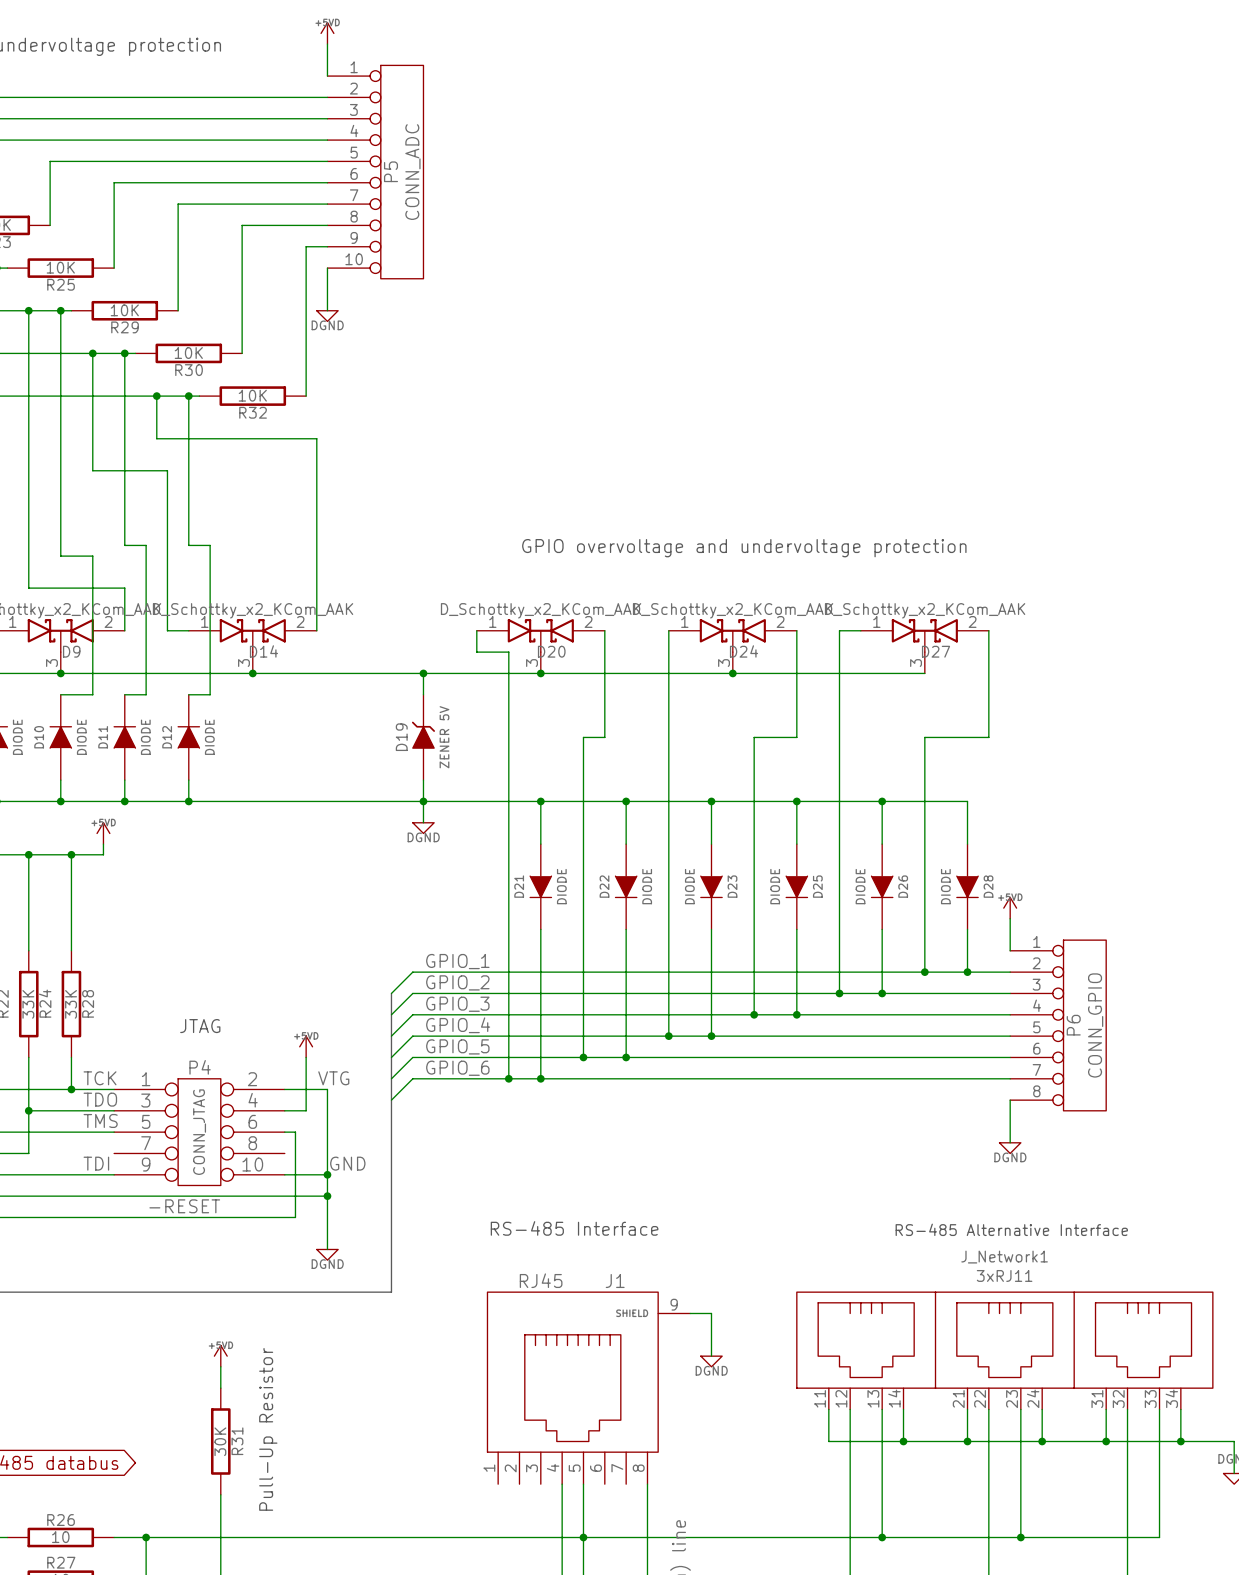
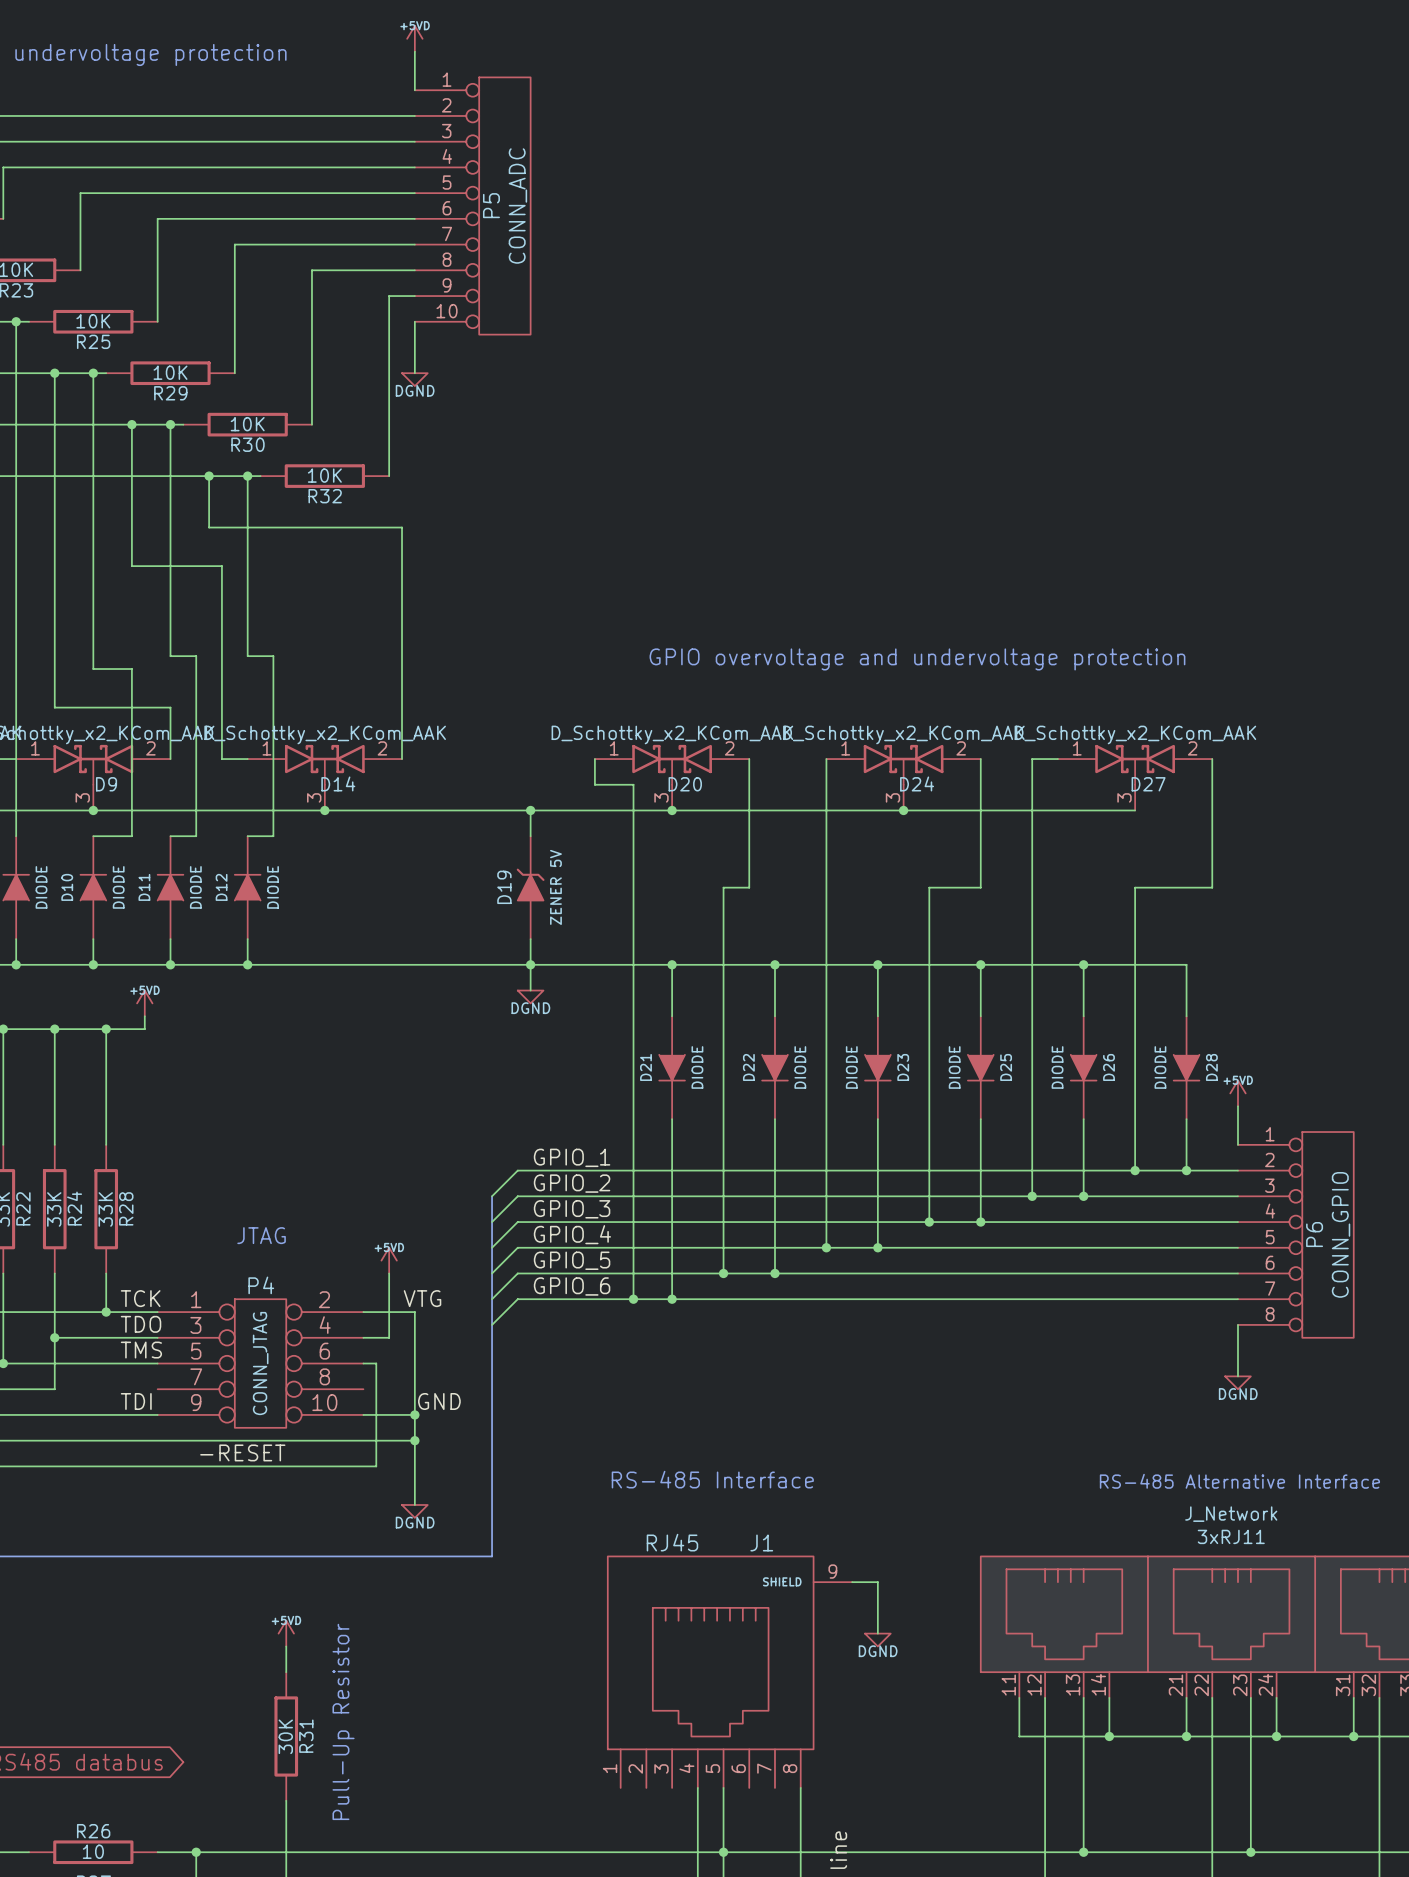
J_Network1 name: J_Network1 (1004, 1257) -> J_Network (1231, 1514)

